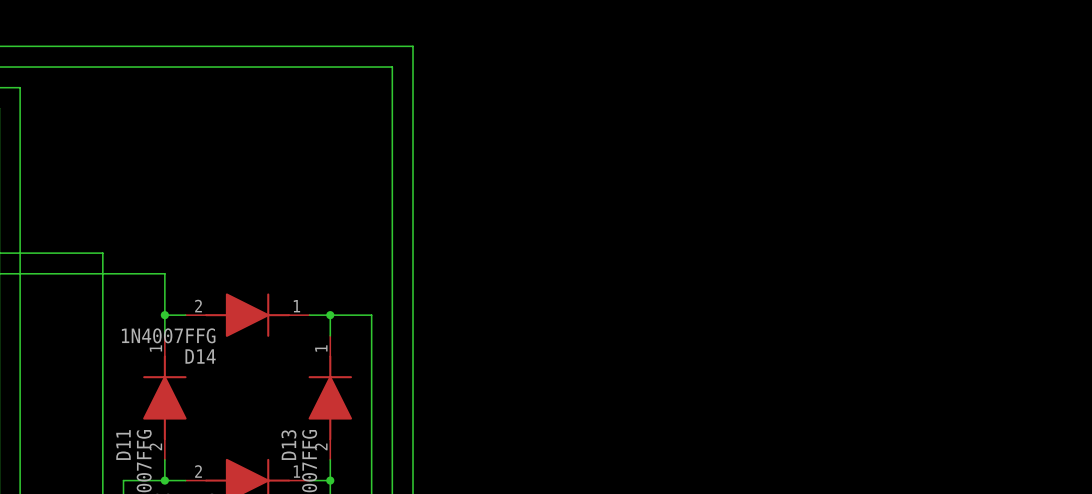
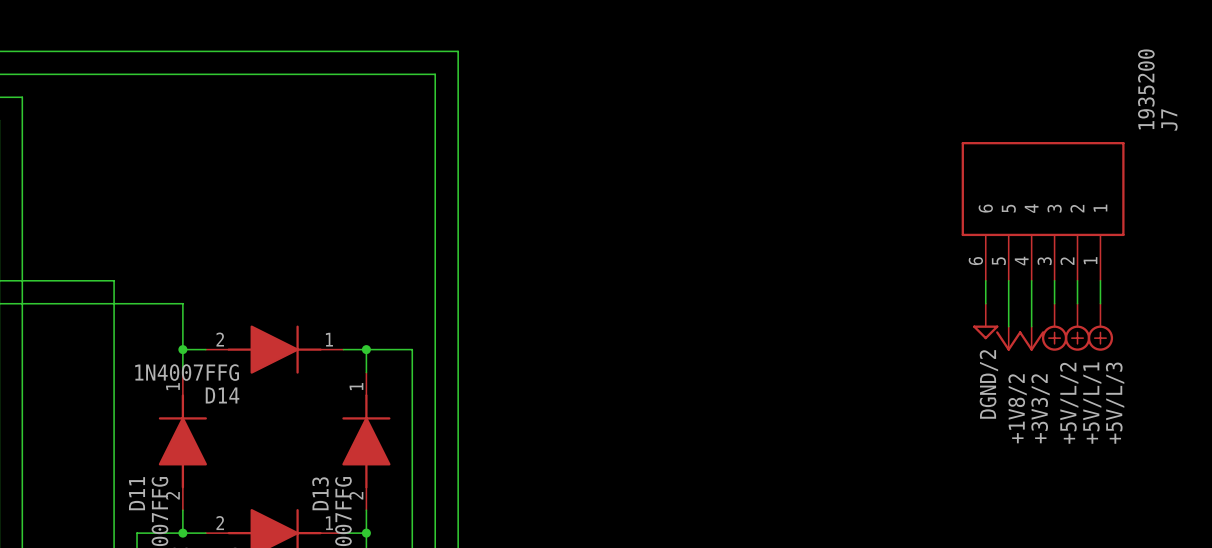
J7: none -> 1935200 (1043, 211)
wire: none -> (985, 280) (985, 303)
wire: none -> (1008, 280) (1008, 326)
wire: none -> (1031, 280) (1031, 326)
wire: none -> (1054, 280) (1054, 303)
wire: none -> (1077, 280) (1077, 303)
wire: none -> (1100, 280) (1100, 303)
power symbol: none -> DGND/2 (985, 321)
power symbol: none -> +5V/L/2 (1054, 327)
power symbol: none -> +5V/L/1 (1077, 327)
power symbol: none -> +5V/L/3 (1100, 327)
power symbol: none -> +1V8/2 (1008, 338)
power symbol: none -> +3V3/2 (1031, 338)

